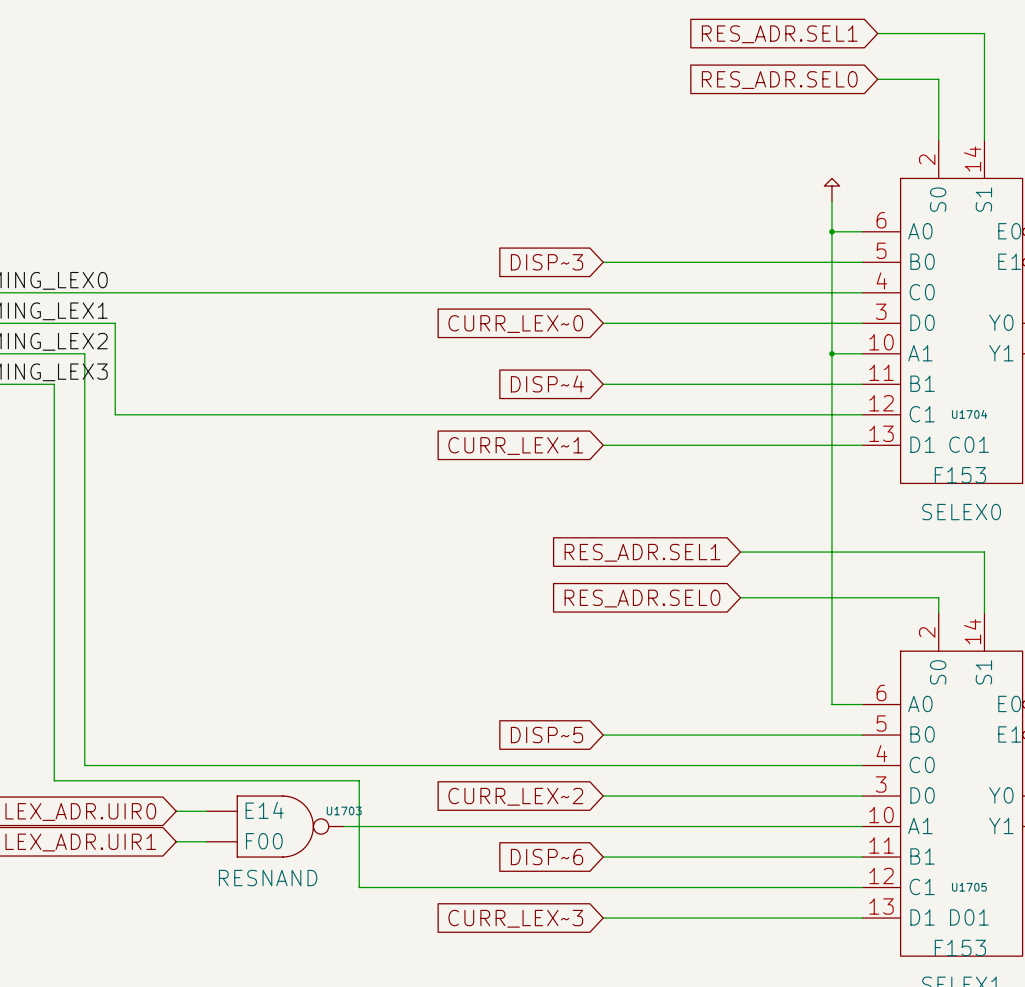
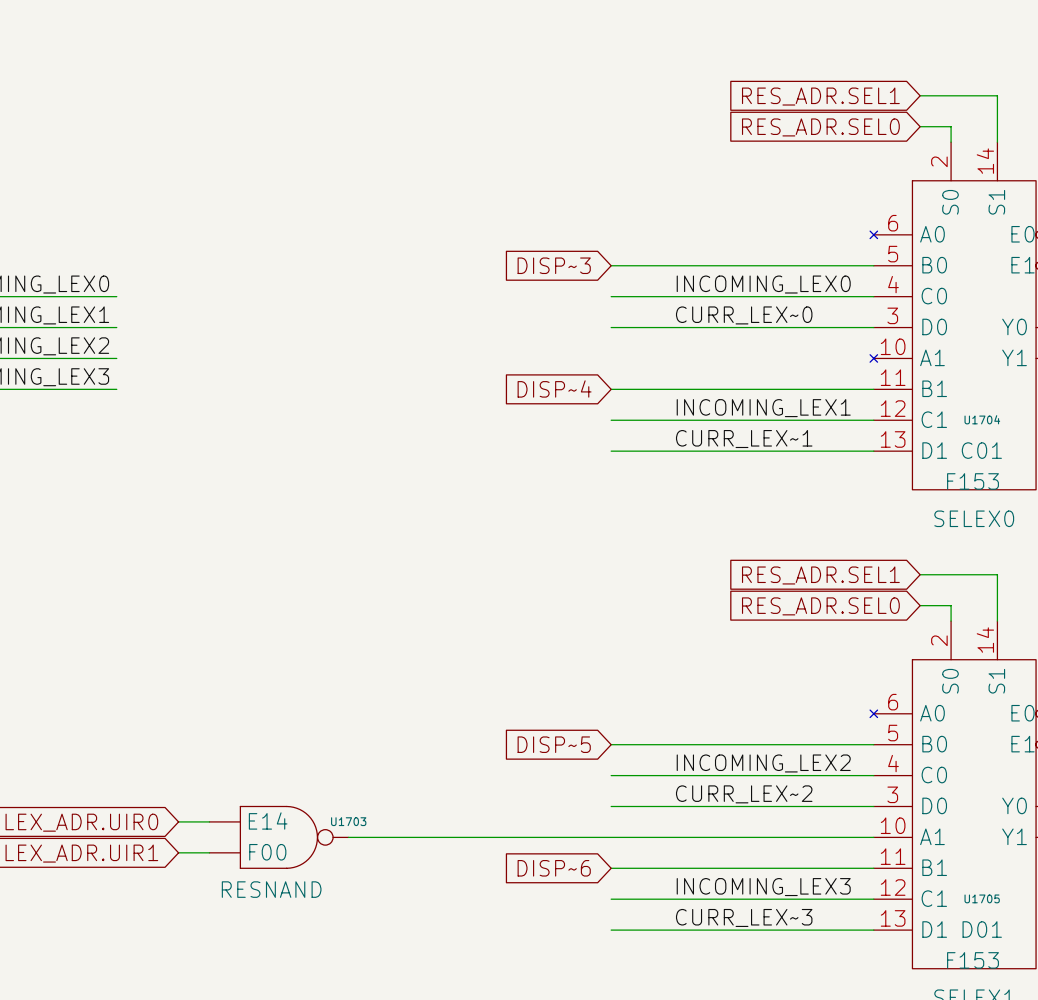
wire: (877, 33) (984, 33) (984, 94) -> (920, 95) (997, 95)
global label position: RES_ADR.SEL1 (779, 34) -> RES_ADR.SEL1 (820, 96)
wire: (877, 79) (938, 79) (938, 125) -> (920, 126) (951, 126)
global label position: RES_ADR.SEL0 (779, 80) -> RES_ADR.SEL0 (820, 127)
power symbol: (831, 189) -> none
wire: (831, 201) (831, 704) (862, 704) -> none
wire: (831, 231) (862, 231) -> none
junction: (831, 231) -> none
no-connect mark: none -> (873, 234)
label: none -> INCOMING_LEX0 (763, 284)
wire: (115, 292) (603, 292) -> none
label: none -> CURR_LEX~0 (744, 315)
wire: (115, 323) (115, 414) (603, 414) -> none
global label: CURR_LEX~0 (515, 324) -> none
wire: (84, 353) (84, 765) (603, 765) -> (85, 358) (116, 358)
wire: (831, 353) (862, 353) -> none
junction: (831, 353) -> none
no-connect mark: none -> (873, 358)
wire: (54, 384) (54, 780) (359, 780) (359, 887) (603, 887) -> (54, 389) (116, 389)
label: none -> INCOMING_LEX1 (763, 408)
label: none -> CURR_LEX~1 (744, 439)
global label: CURR_LEX~1 (515, 446) -> none
global label: RES_ADR.SEL1 (642, 552) -> none
wire: (740, 552) (984, 552) (984, 567) -> (920, 574) (997, 574)
global label: none -> RES_ADR.SEL1 (820, 575)
wire: (740, 597) (908, 597) -> none
global label: RES_ADR.SEL0 (642, 598) -> none
global label: none -> RES_ADR.SEL0 (820, 606)
no-connect mark: none -> (873, 713)
label: none -> INCOMING_LEX2 (763, 763)
label: none -> CURR_LEX~2 (744, 794)
global label: CURR_LEX~2 (515, 796) -> none
label: none -> INCOMING_LEX3 (763, 887)
label: none -> CURR_LEX~3 (744, 917)
global label: CURR_LEX~3 (515, 918) -> none

